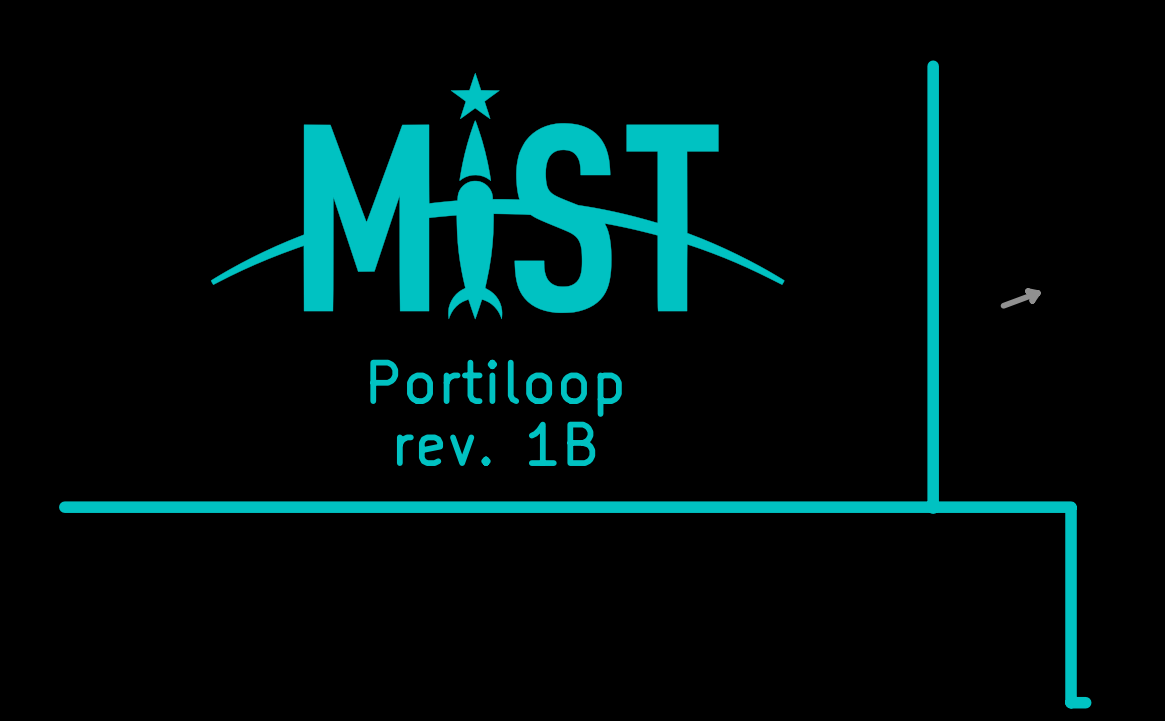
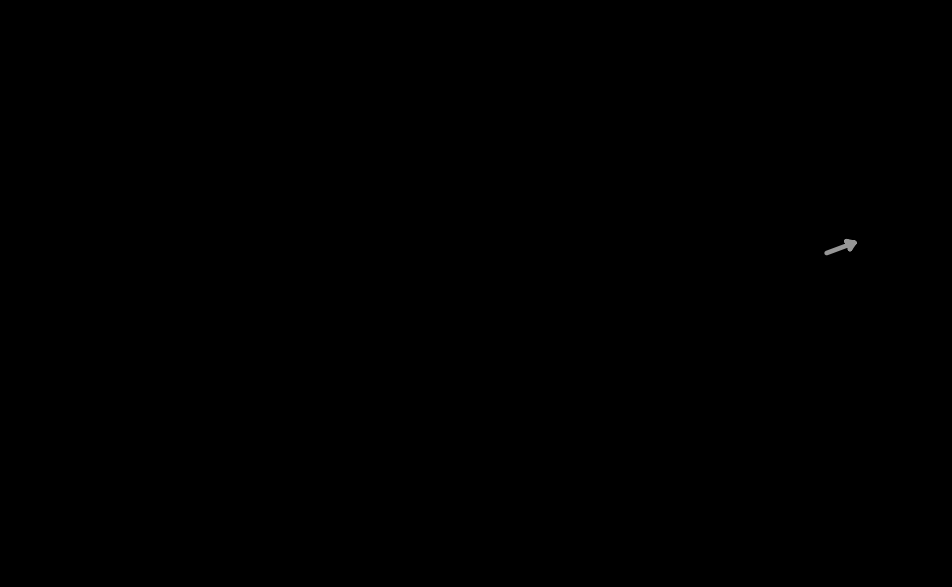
line: (933, 66) (933, 508) -> none
drawing: [210, 73, 785, 320] -> none
text: Portiloop (496, 388) -> none
text: rev. 1B (496, 443) -> none
line: (1071, 507) (64, 507) -> none
line: (1071, 508) (1071, 702) (1085, 702) -> none

